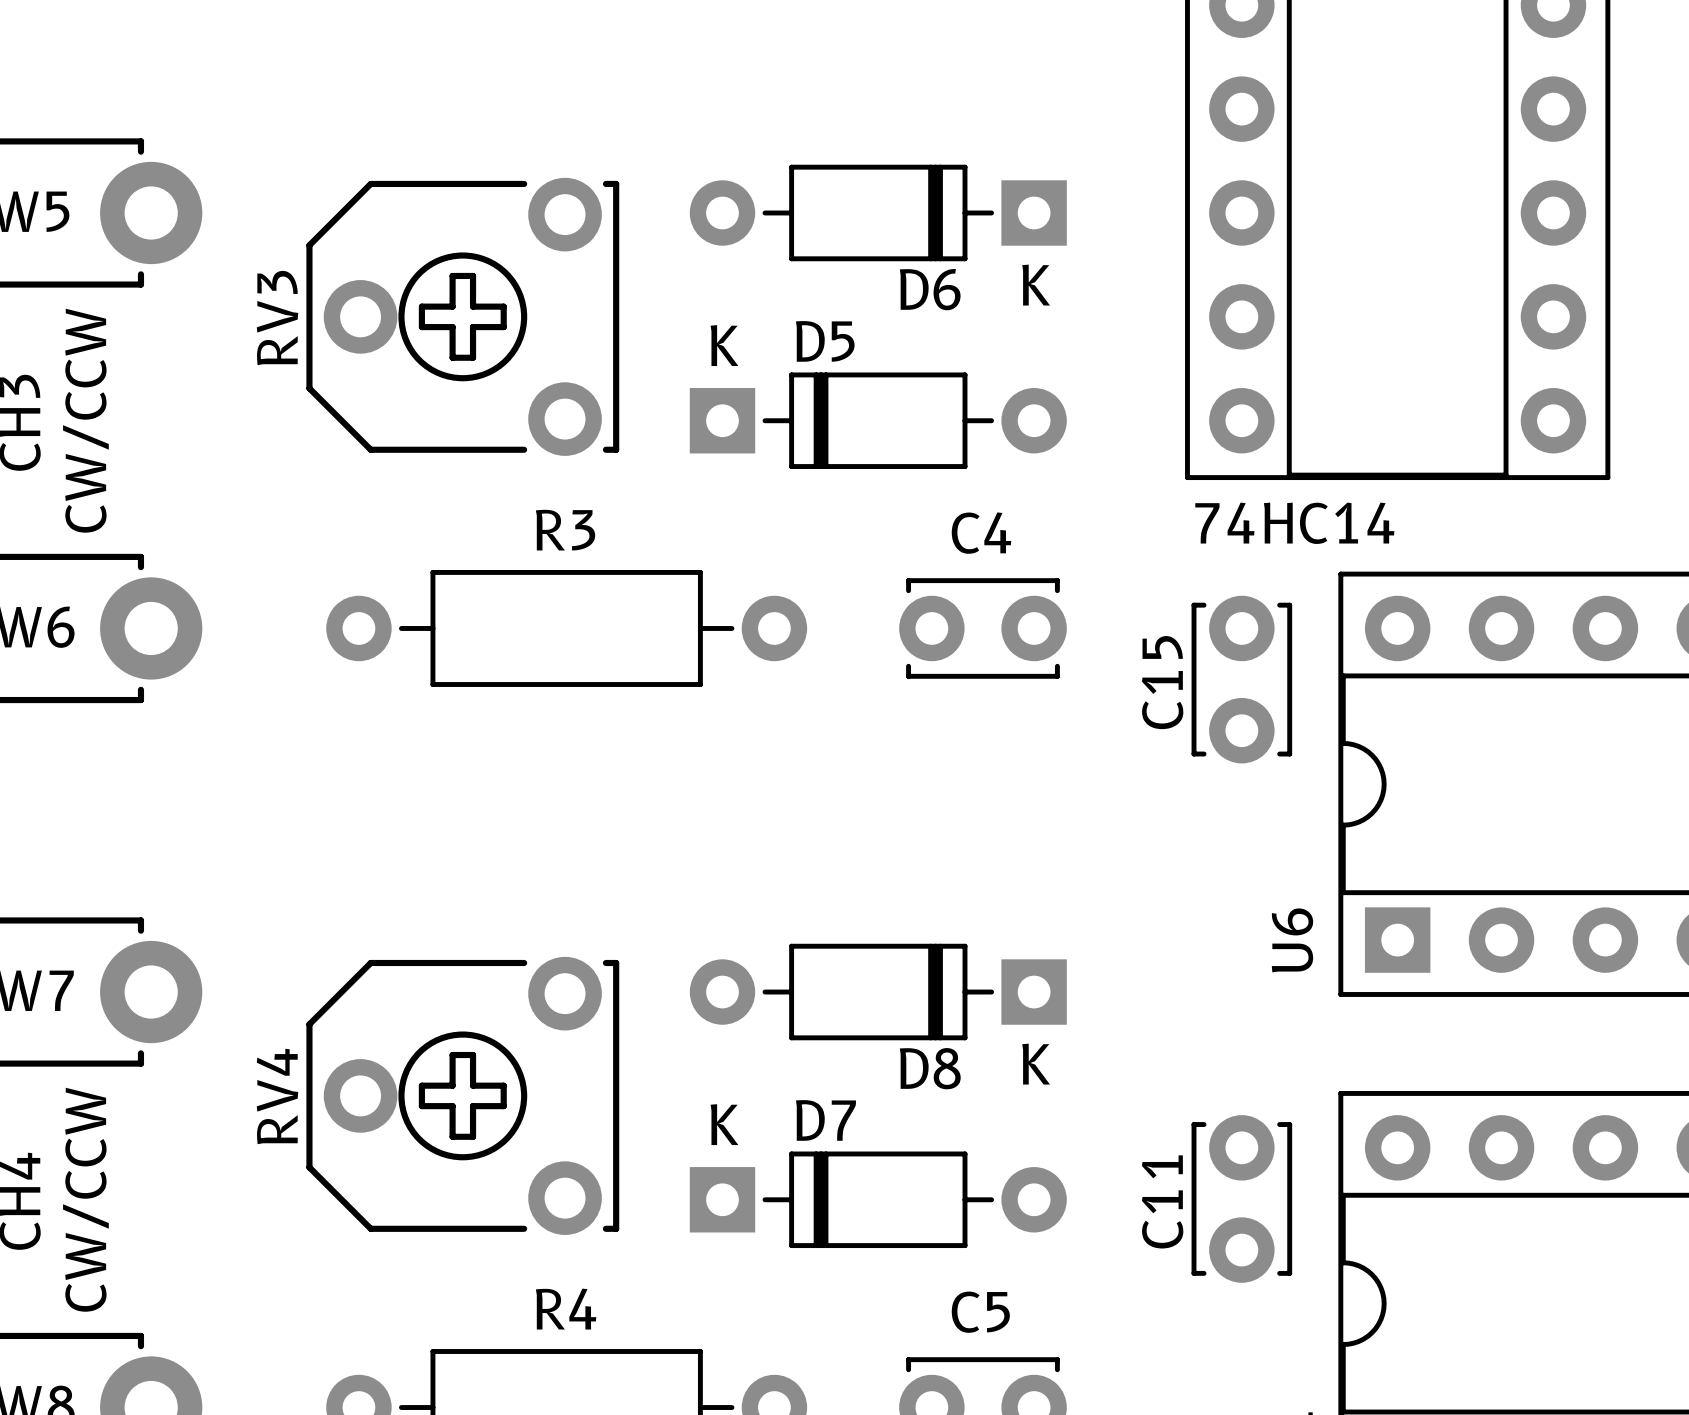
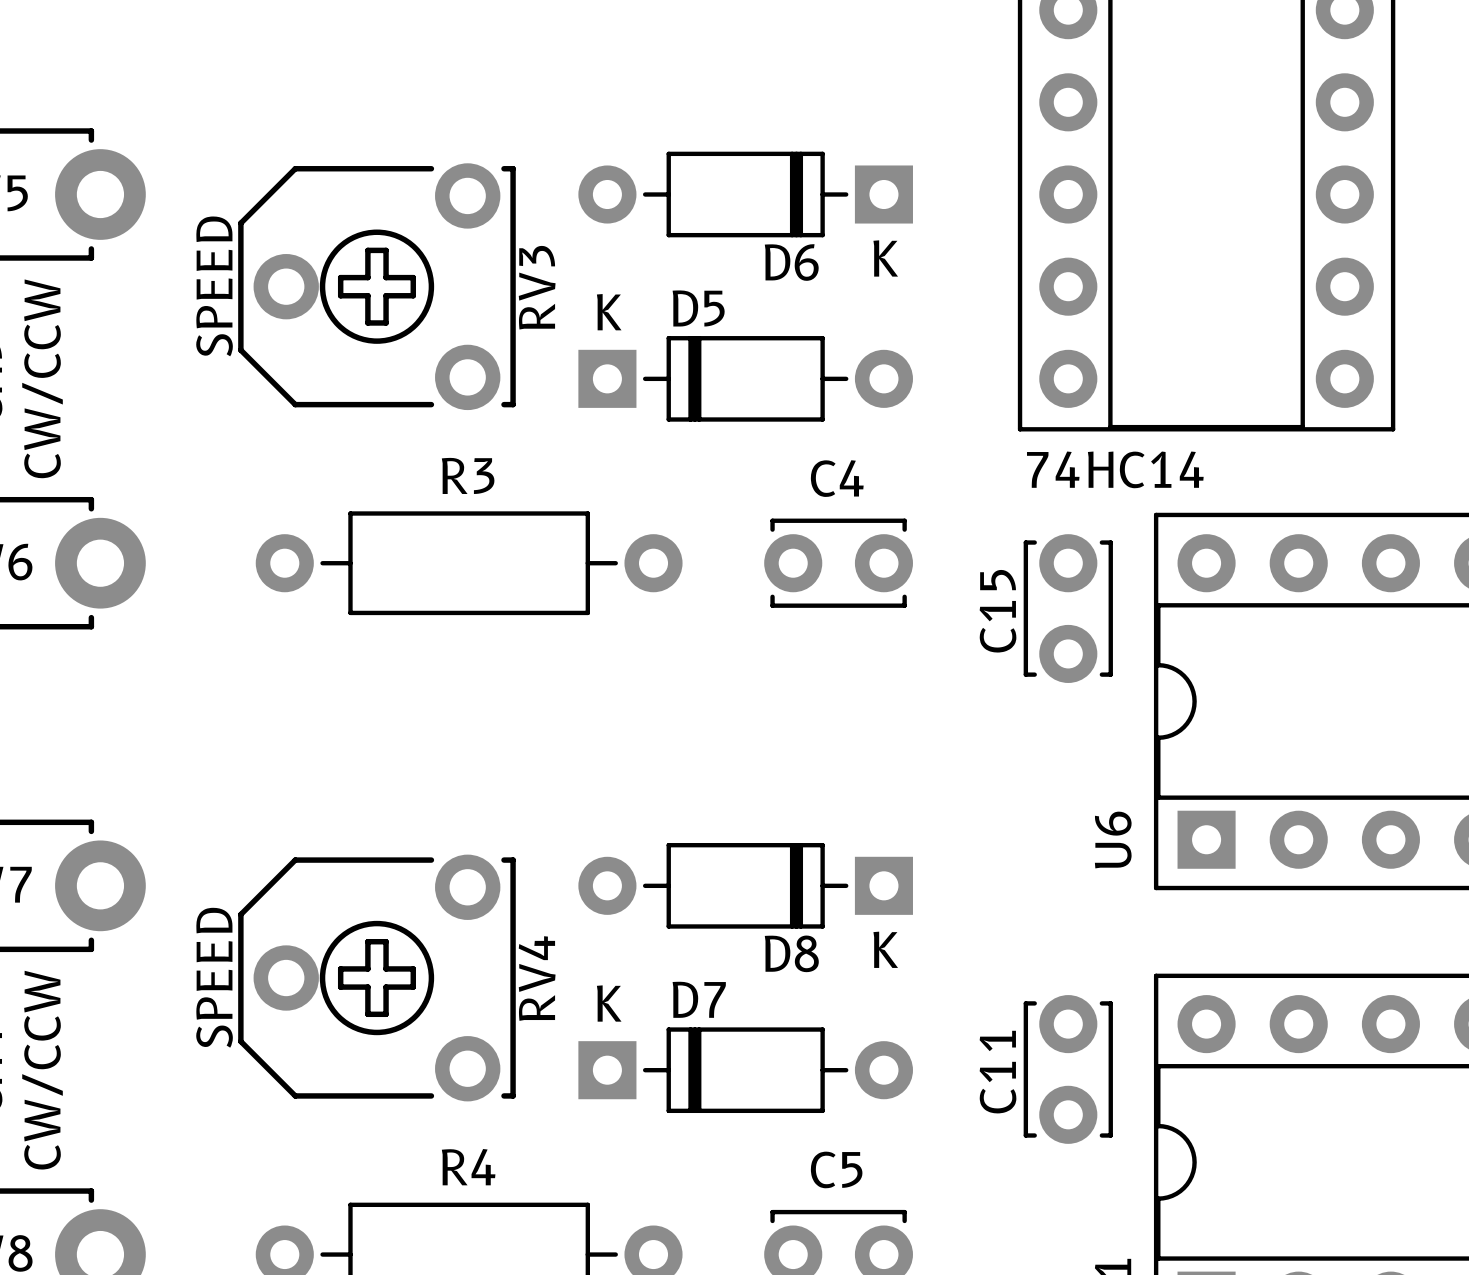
text: none -> SPEED (214, 286)
RV3 name position: RV3 (277, 318) -> RV3 (537, 287)
text: none -> SPEED (214, 977)
RV4 name position: RV4 (277, 1096) -> RV4 (537, 978)

